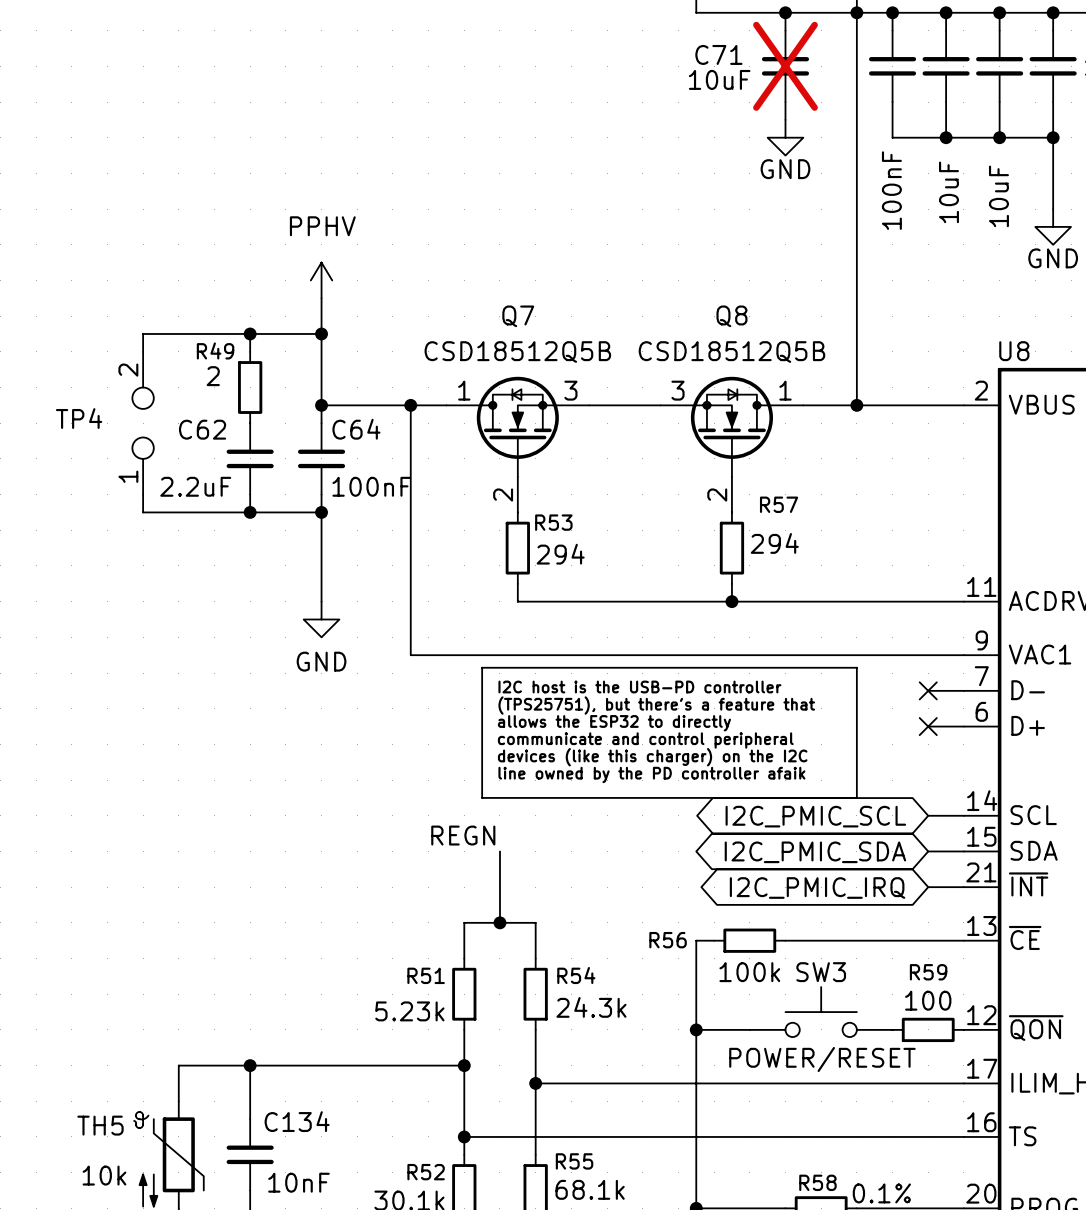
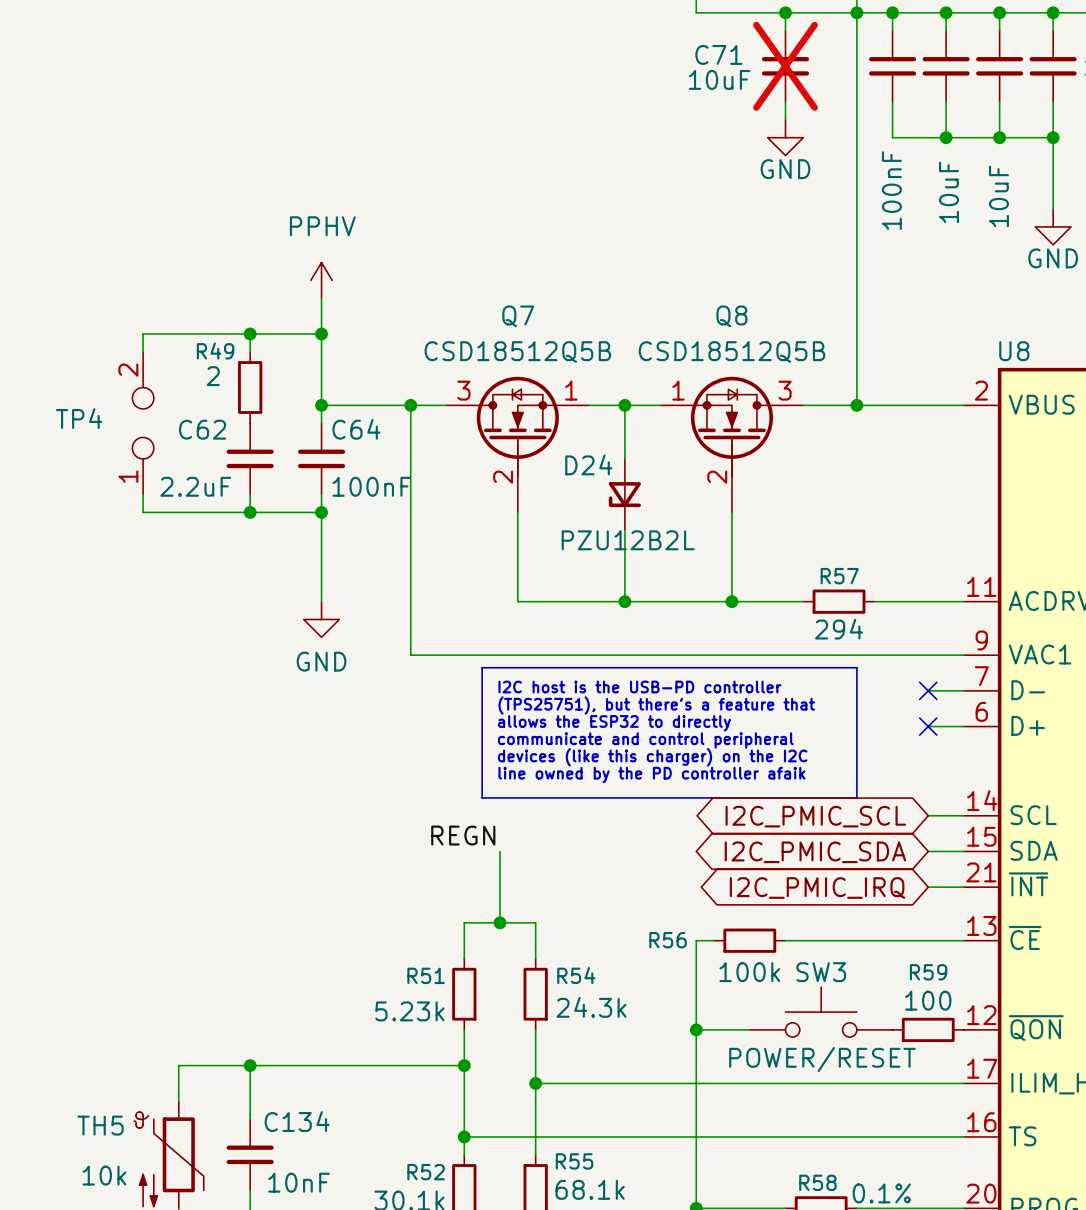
Q7 symbol: [446, 376, 590, 513] -> [446, 376, 590, 513]
Q8 symbol: [660, 376, 804, 513] -> [660, 376, 804, 513]
wire: none -> (624, 405) (624, 458)
junction: none -> (624, 405)
D24: none -> PZU12B2L (624, 494)
R57 name position: R57 (779, 504) -> R57 (839, 576)
wire: none -> (517, 512) (517, 583)
wire: none -> (731, 512) (731, 583)
wire: none -> (624, 530) (624, 601)
R53: 294 (517, 548) -> none
R57 rotation: 0° (731, 548) -> 90° clockwise (839, 601)
R57 position: (731, 548) -> (839, 601)
junction: none -> (624, 601)
wire: (803, 601) (874, 601) -> none

